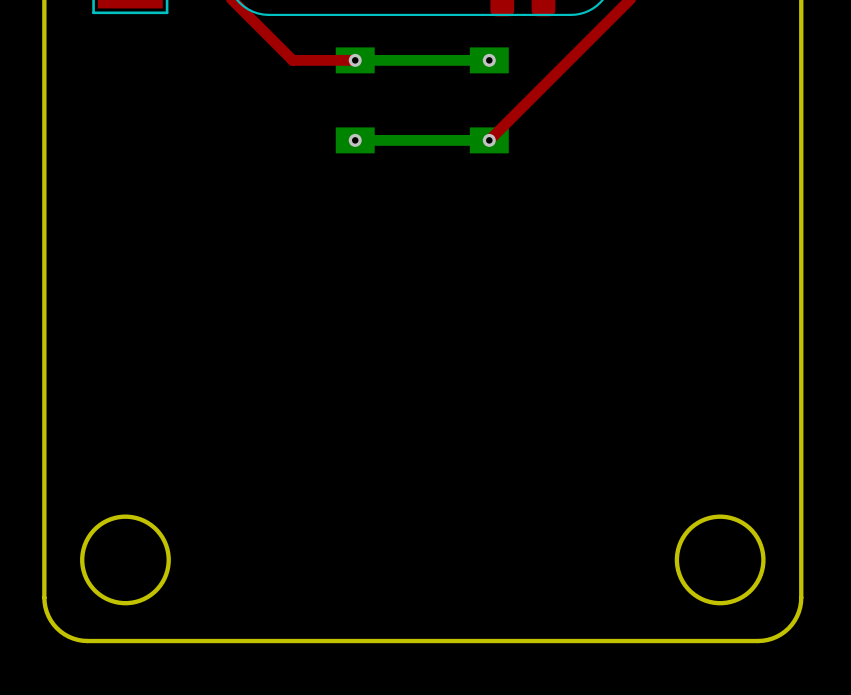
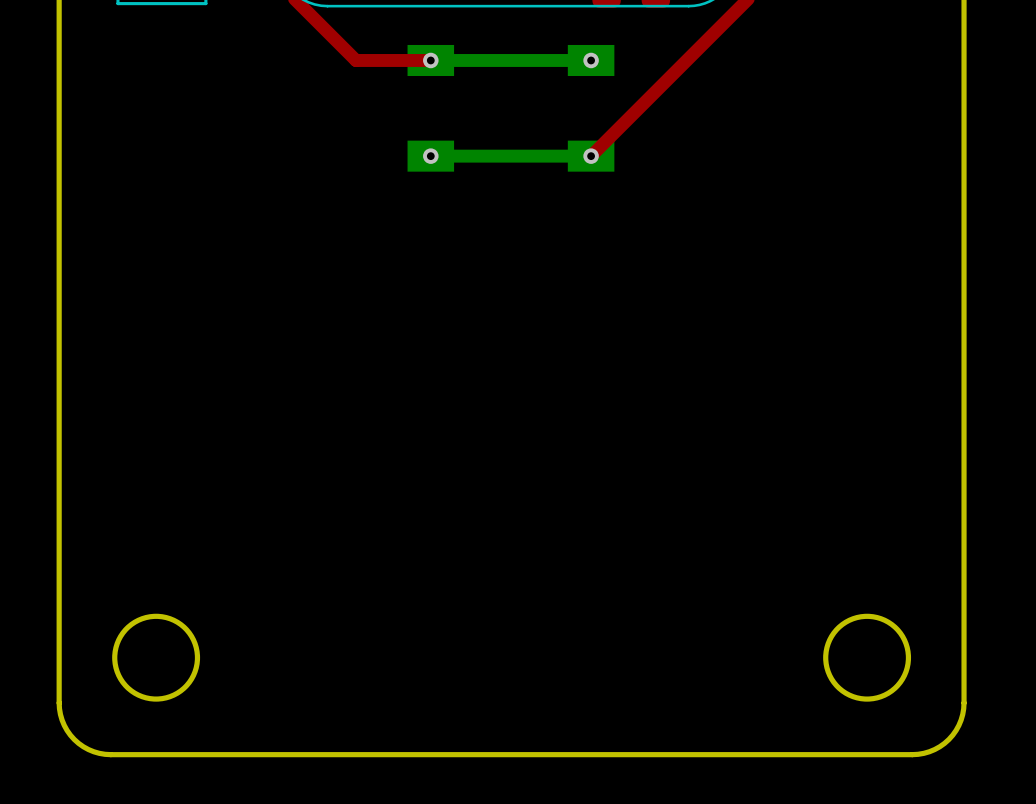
round board edge size: [80, 514, 171, 606] -> [112, 613, 201, 702]
round board edge size: [674, 514, 766, 606] -> [823, 613, 912, 702]

